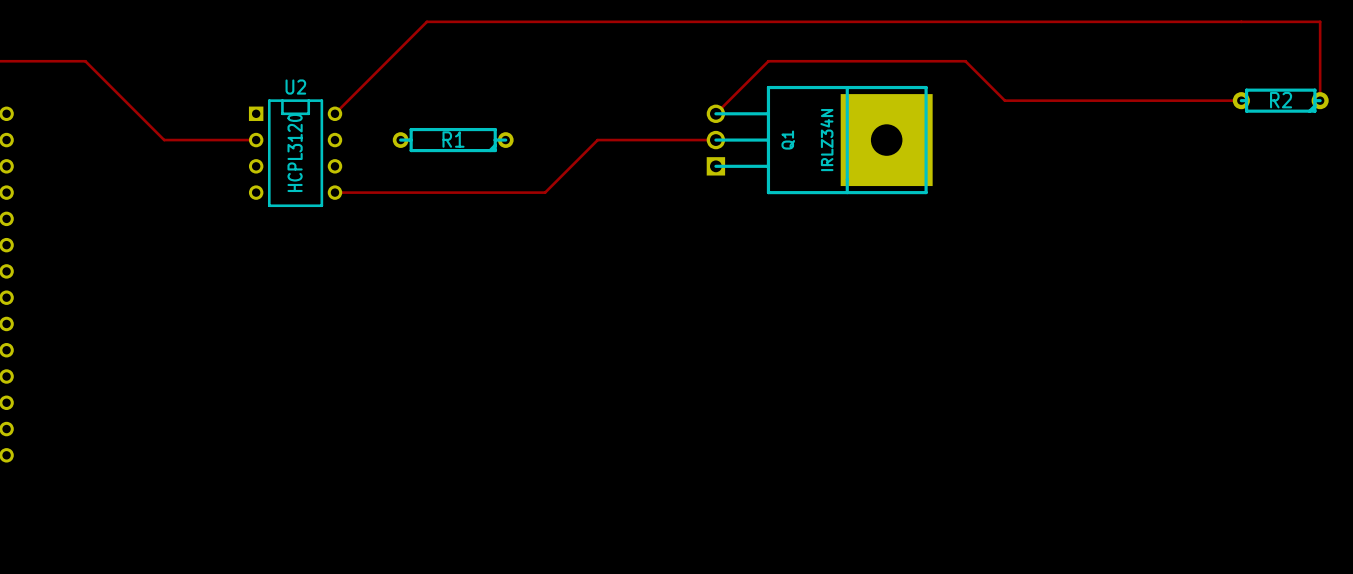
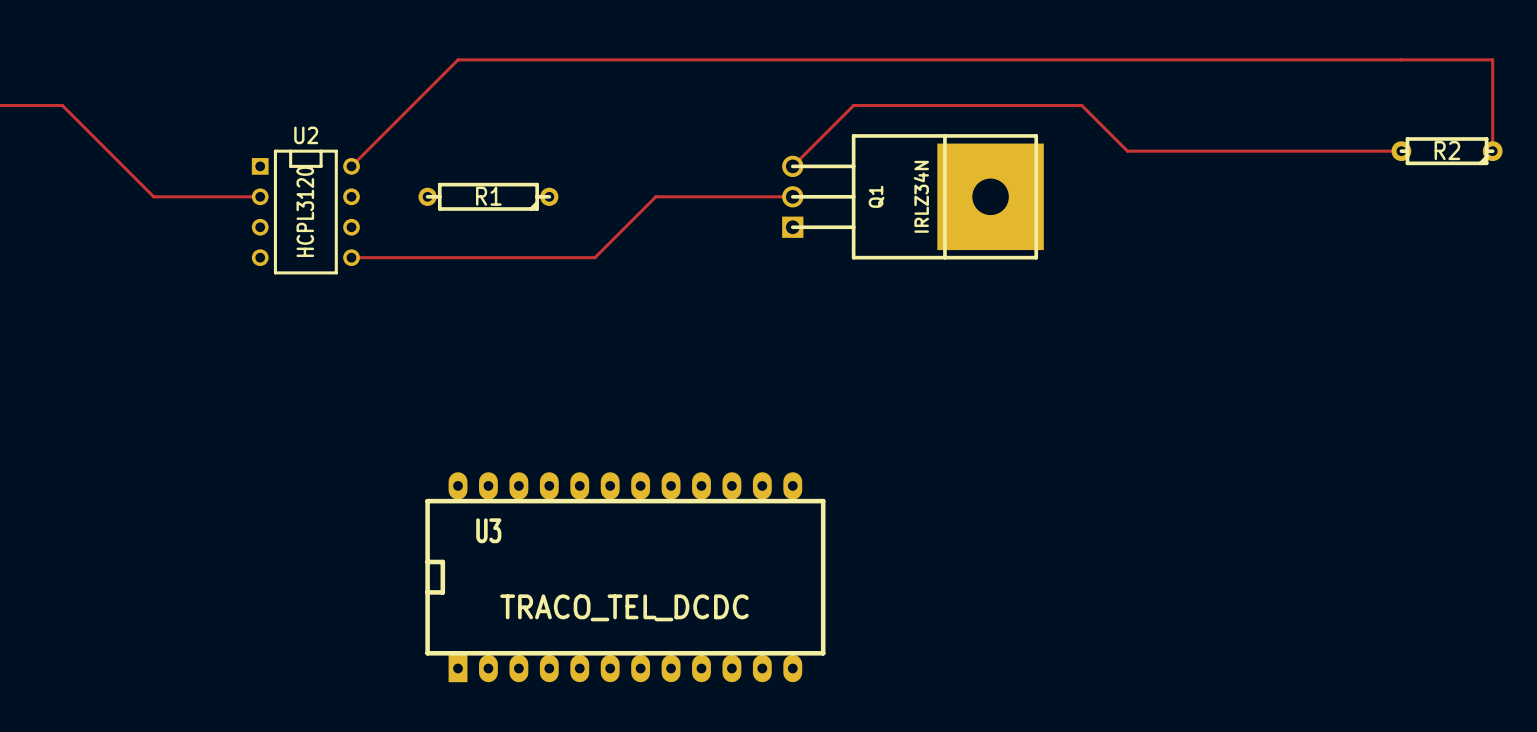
U3: none -> TRACO_TEL_DCDC (625, 577)

